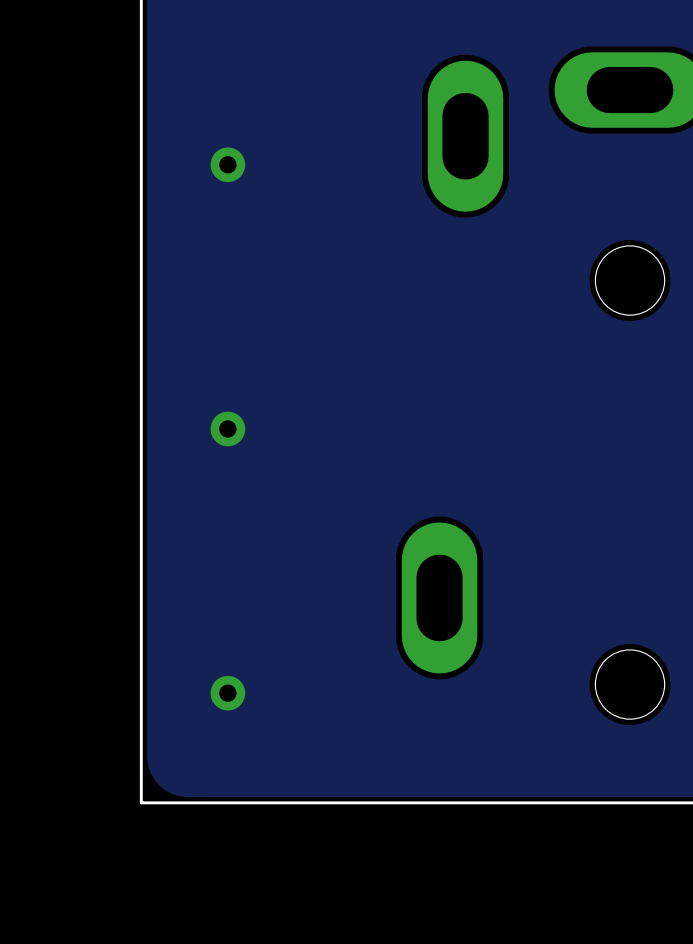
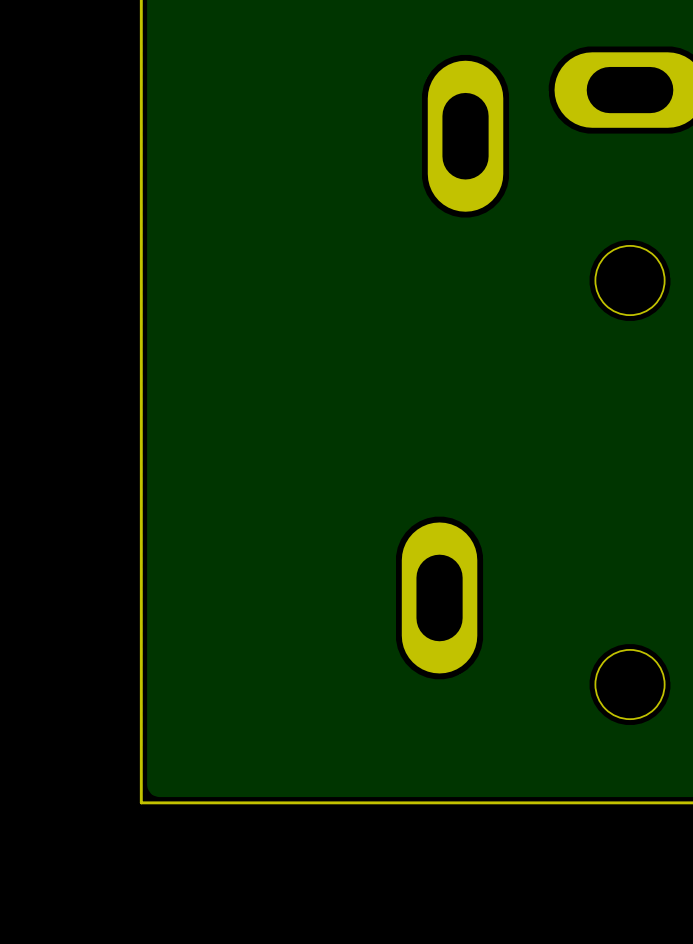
via: (227, 164) -> none
via: (227, 428) -> none
via: (227, 693) -> none

